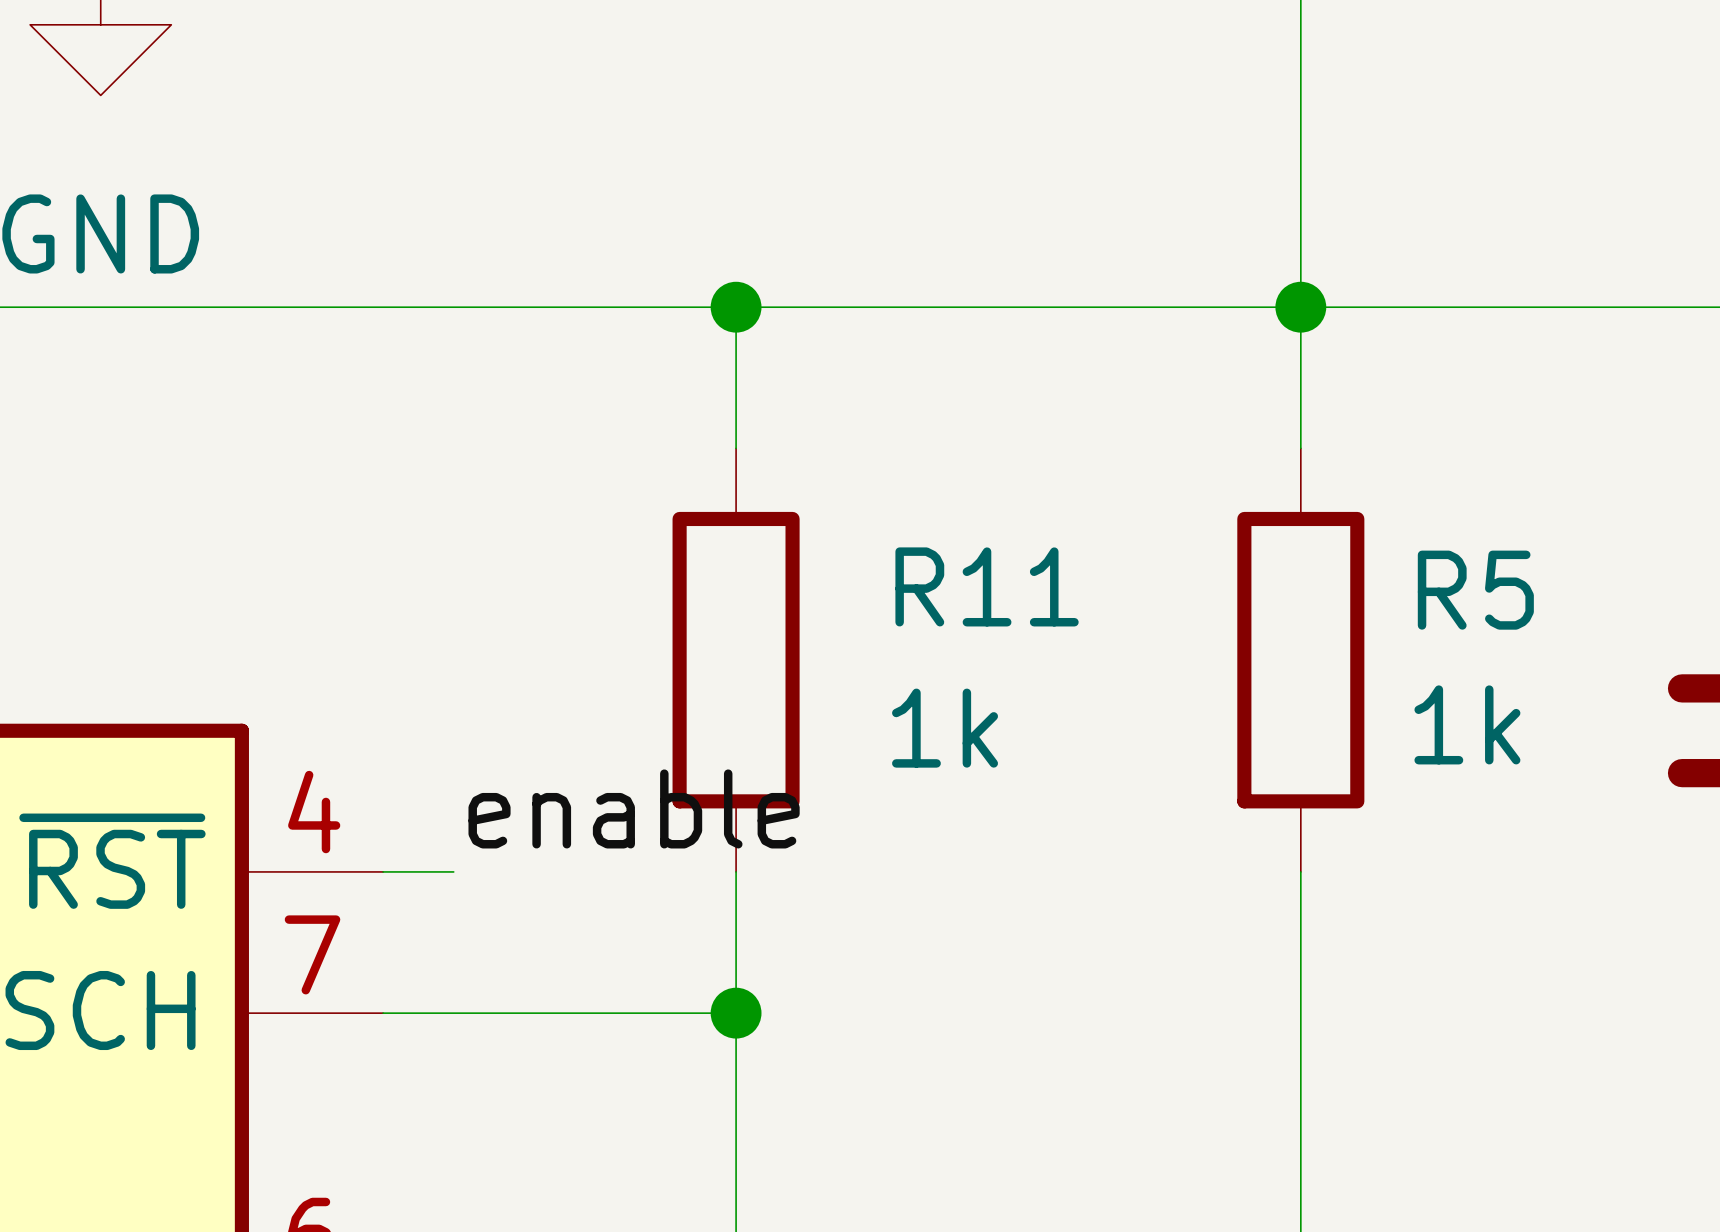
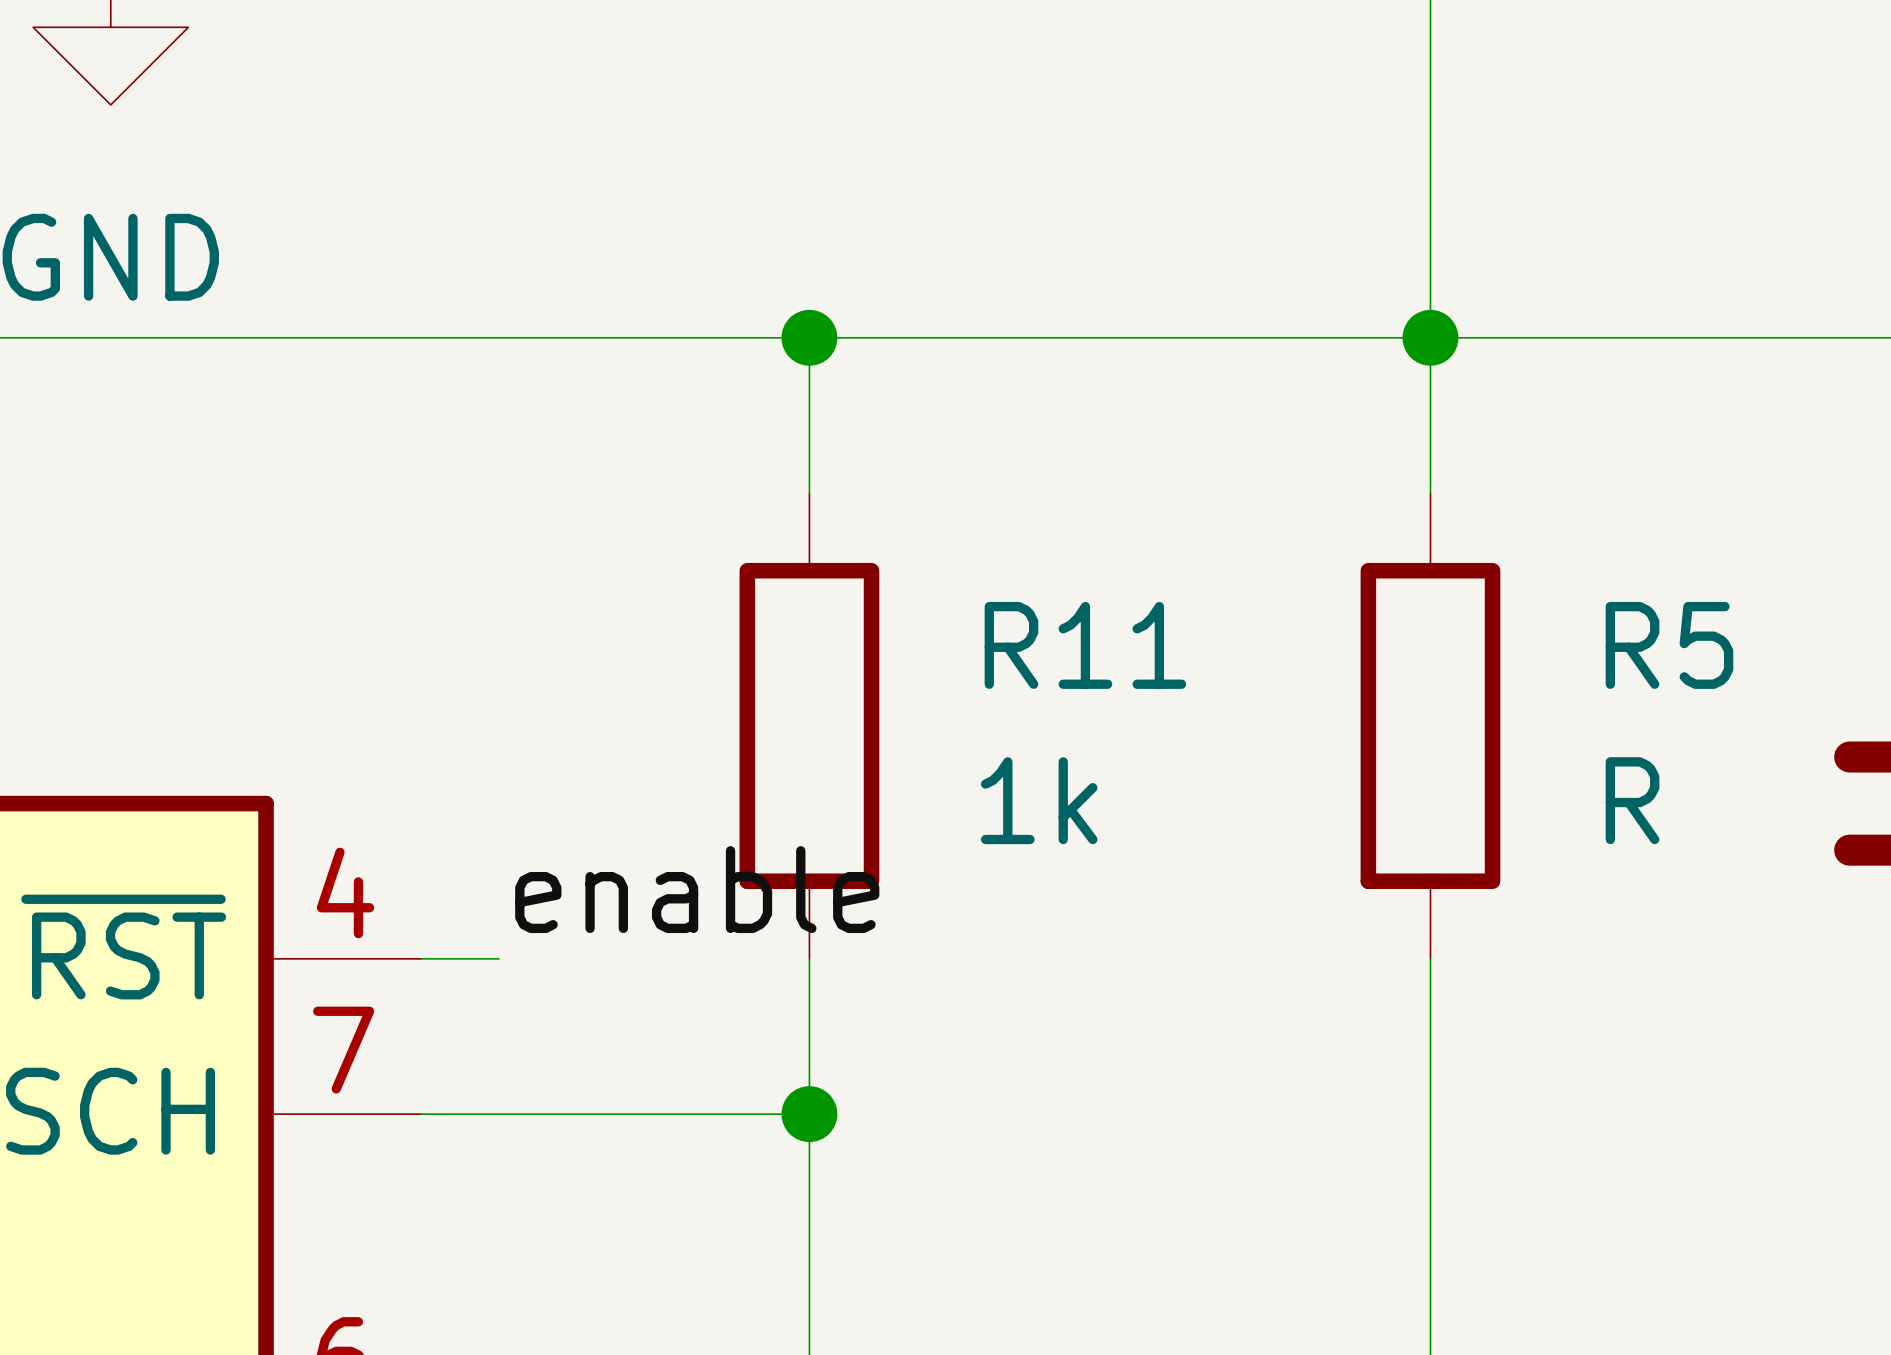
R5 name position: R5 (1475, 590) -> R5 (1669, 645)
R5 value: 1k (1467, 724) -> R (1632, 800)

